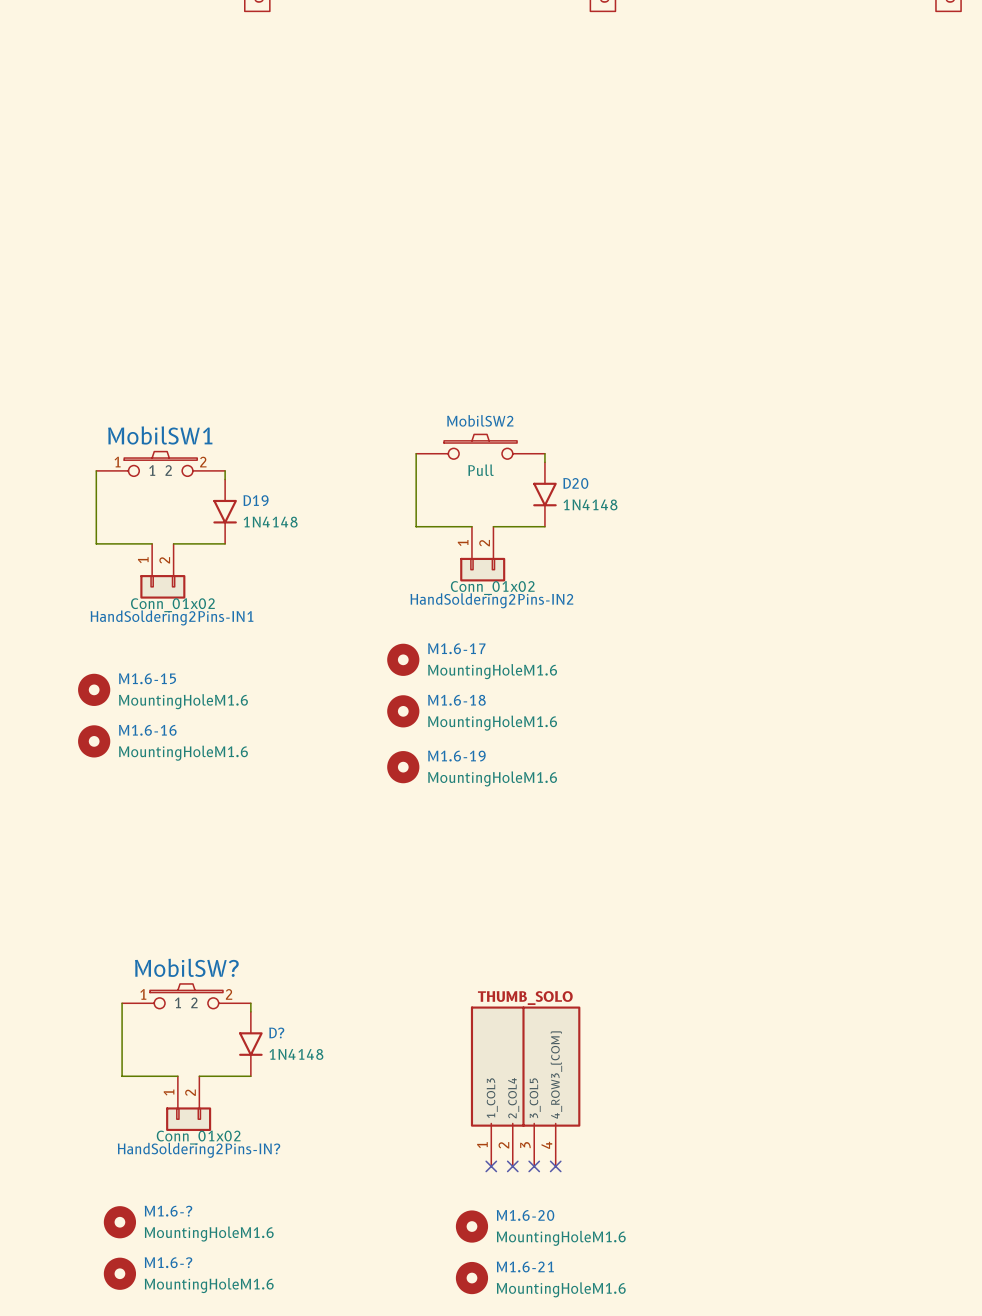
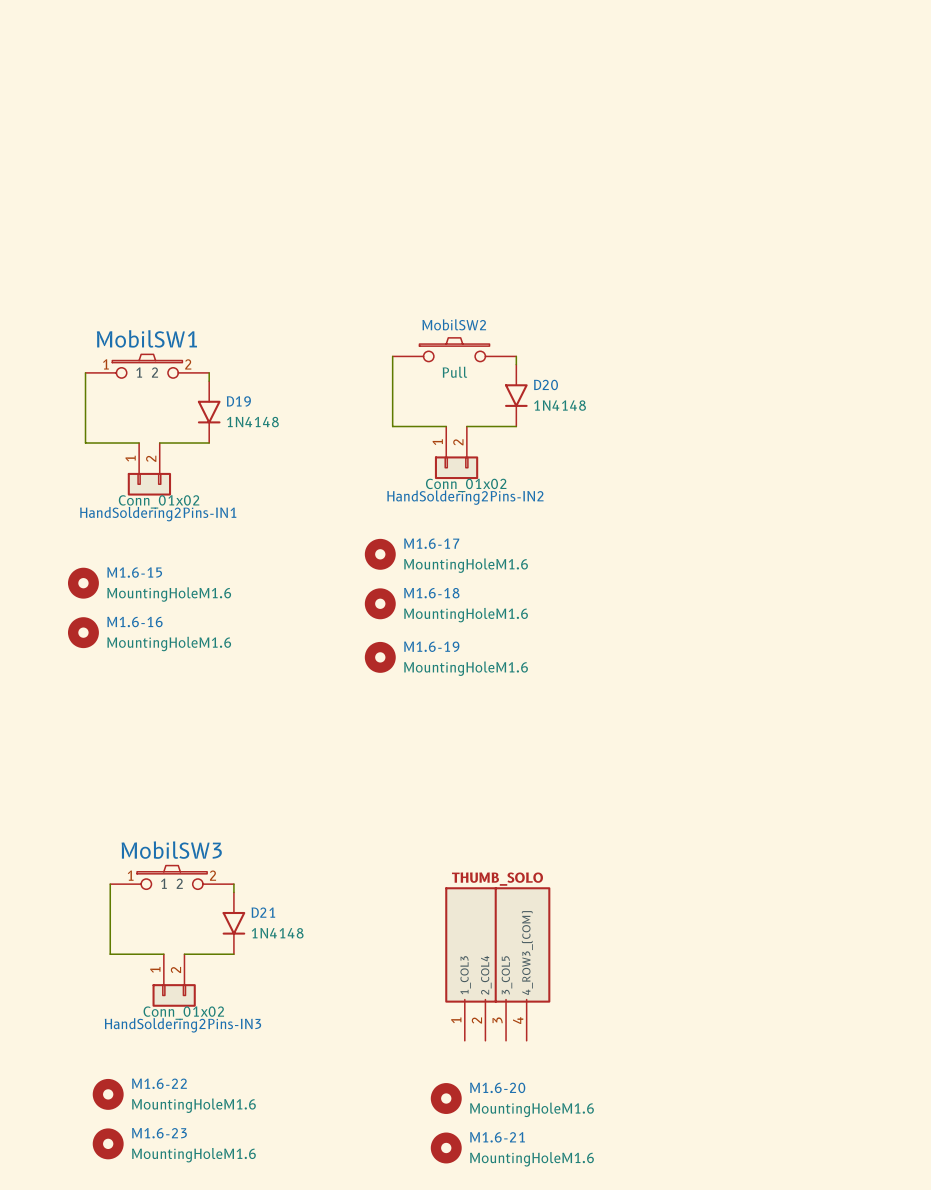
MobilSW? name: MobilSW? (186, 967) -> MobilSW3 (171, 850)
D? name: D? (276, 1032) -> D21 (263, 912)
HandSoldering2Pins-IN? name: HandSoldering2Pins-IN? (199, 1150) -> HandSoldering2Pins-IN3 (182, 1025)
no-connect mark: (491, 1166) -> none
no-connect mark: (512, 1166) -> none
no-connect mark: (534, 1166) -> none
no-connect mark: (555, 1166) -> none
M1.6-? name: M1.6-? (168, 1211) -> M1.6-22 (159, 1083)
M1.6-? name: M1.6-? (168, 1262) -> M1.6-23 (159, 1133)

